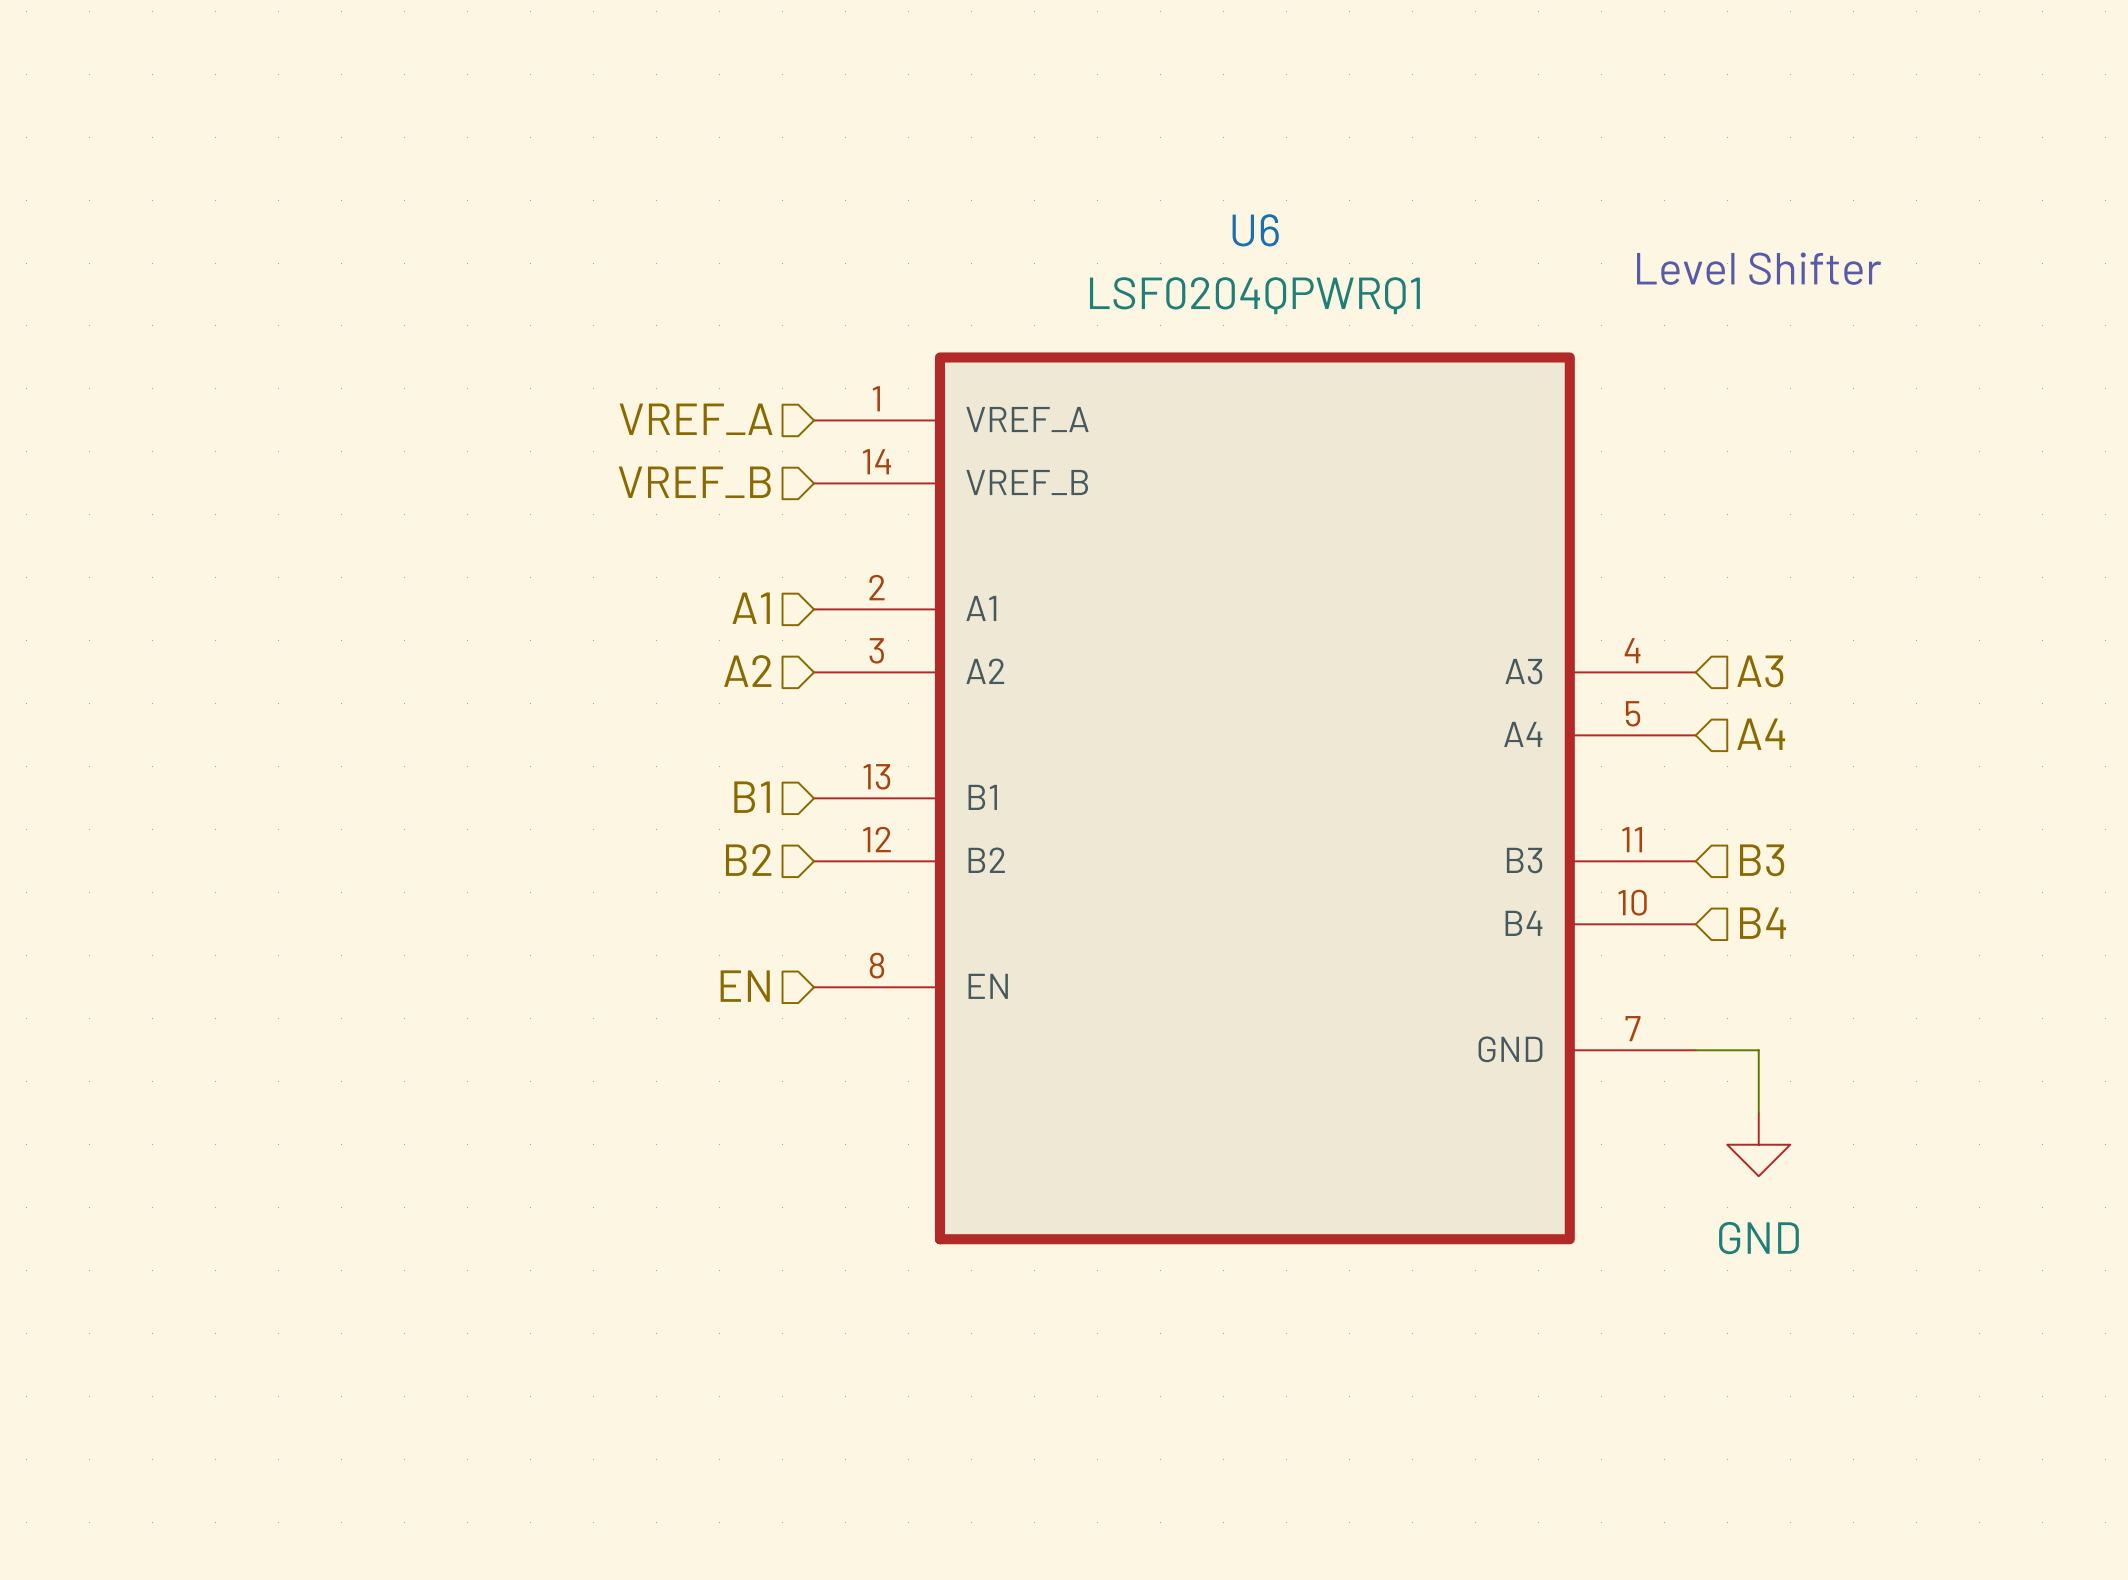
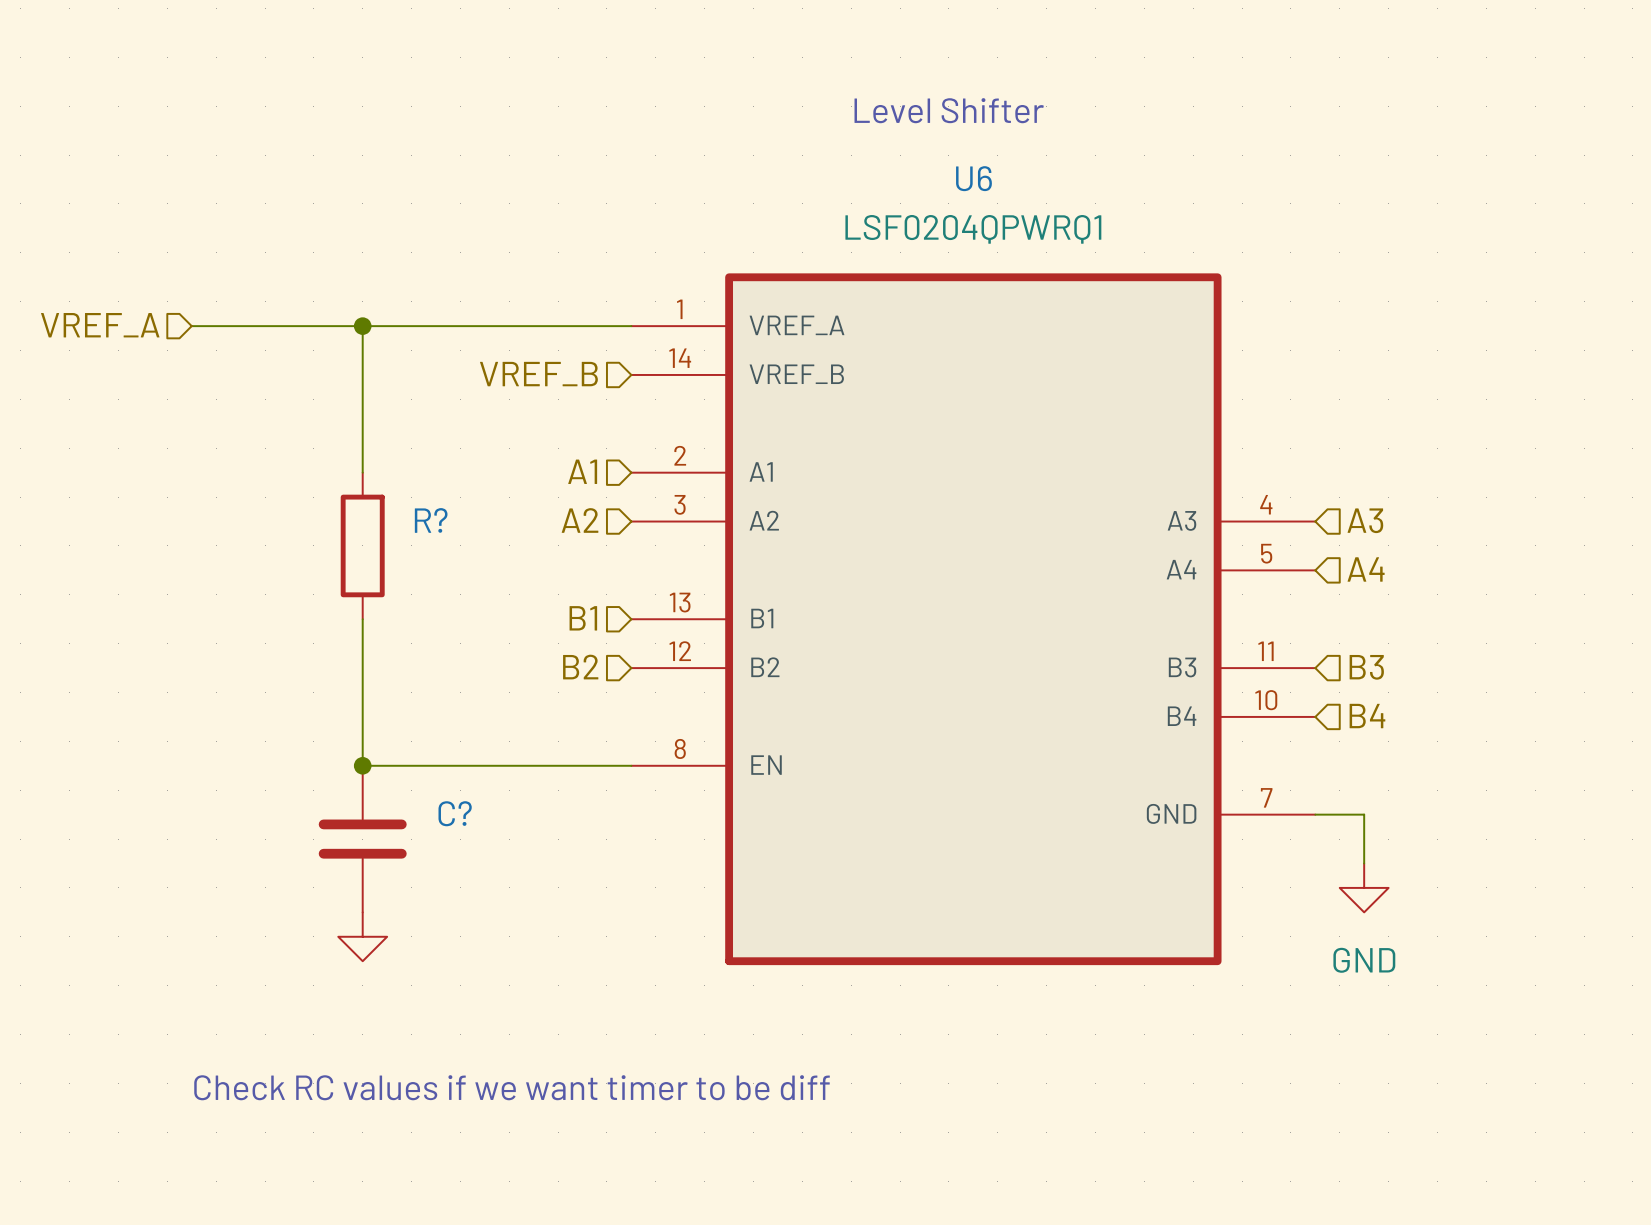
text position: Level Shifter (1759, 268) -> Level Shifter (949, 110)
hierarchical label position: VREF_A (696, 419) -> VREF_A (100, 325)
wire: none -> (191, 326) (631, 326)
wire: none -> (362, 326) (362, 472)
junction: none -> (362, 326)
R?: none -> (362, 545)
wire: none -> (362, 619) (362, 765) (631, 765)
hierarchical label: EN (745, 986) -> none
junction: none -> (362, 765)
C?: none -> (362, 839)
power symbol: none -> (362, 936)
text: none -> Check RC values if we want timer to be diff (512, 1087)

